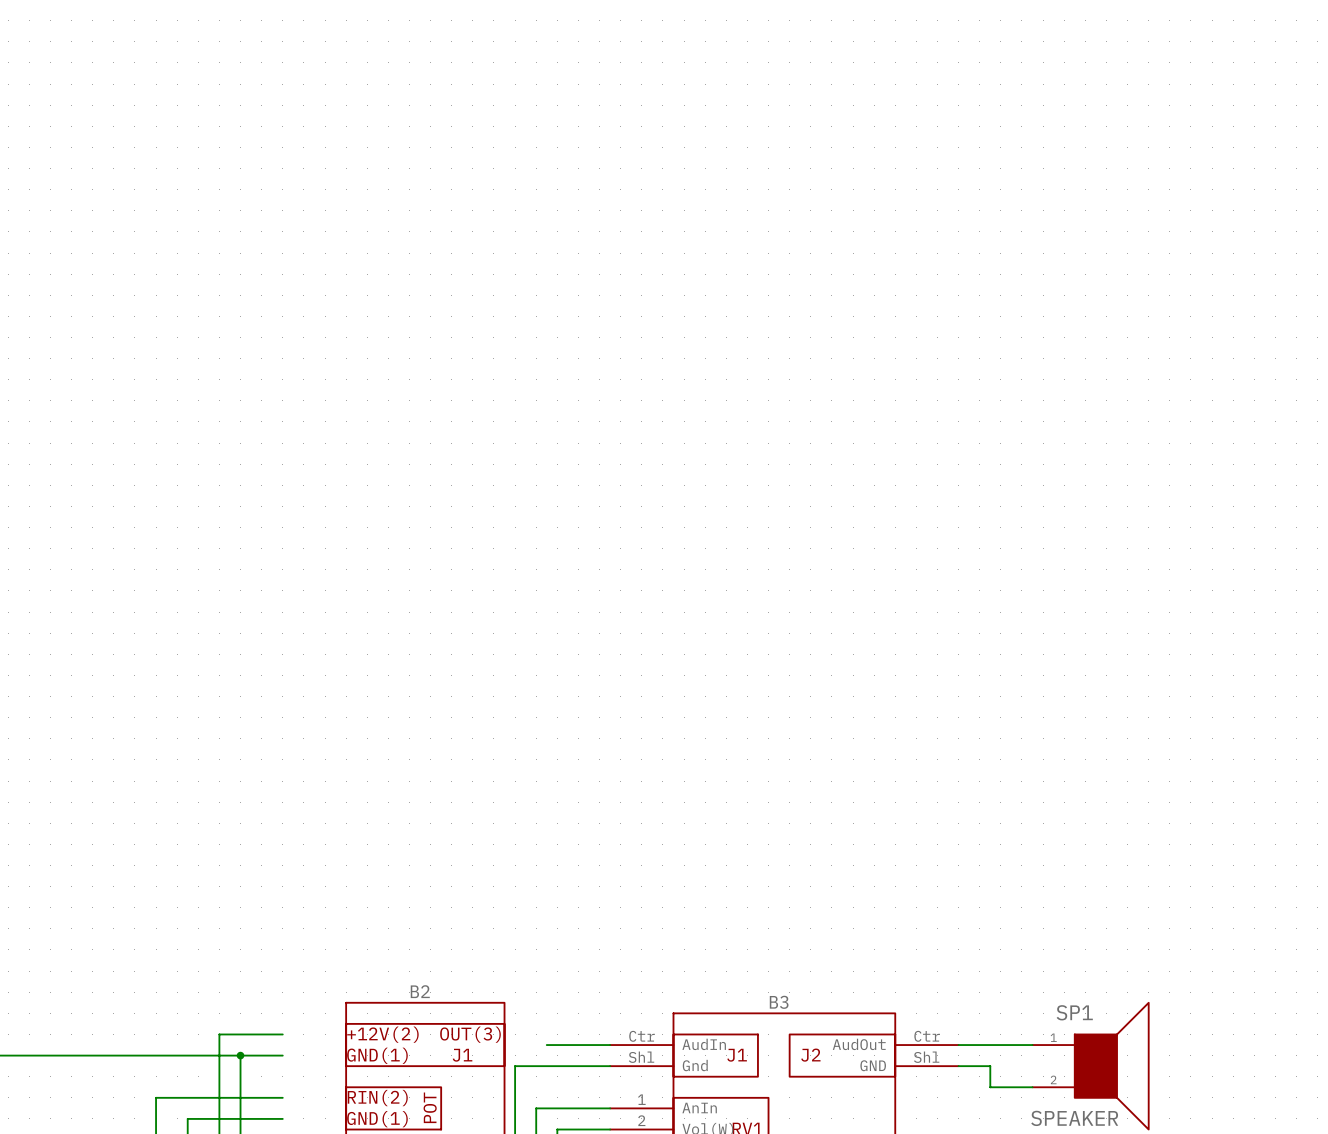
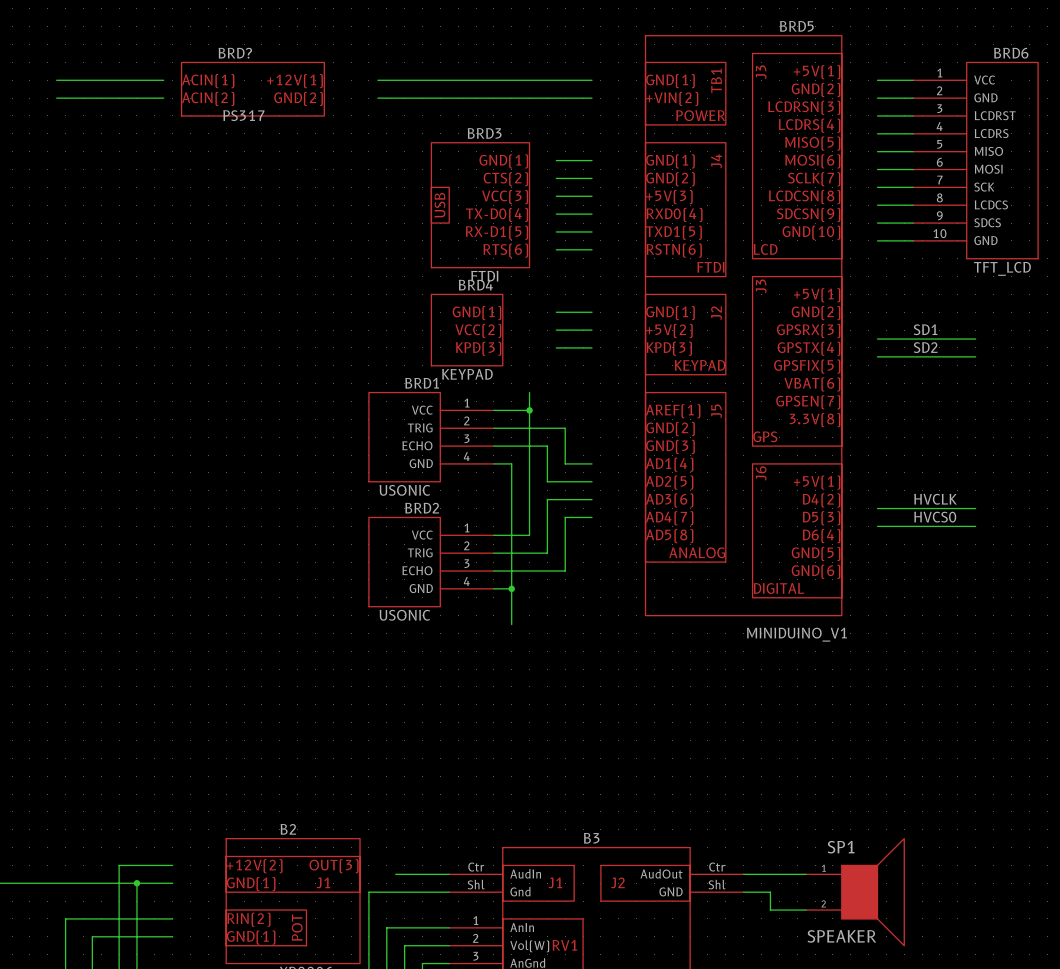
wire: none -> (56, 80) (163, 80)
wire: none -> (377, 80) (591, 80)
wire: none -> (877, 80) (913, 80)
BRD?: none -> PS317 (252, 89)
wire: none -> (56, 98) (163, 98)
wire: none -> (377, 98) (591, 98)
wire: none -> (877, 98) (913, 98)
wire: none -> (877, 115) (913, 115)
wire: none -> (877, 133) (913, 133)
wire: none -> (877, 151) (913, 151)
wire: none -> (556, 160) (591, 160)
BRD6: none -> TFT_LCD (975, 160)
wire: none -> (877, 169) (913, 169)
wire: none -> (556, 178) (591, 178)
wire: none -> (877, 187) (913, 187)
wire: none -> (556, 196) (591, 196)
BRD3: none -> FTDI (480, 205)
wire: none -> (877, 205) (913, 205)
wire: none -> (556, 214) (591, 214)
wire: none -> (877, 223) (913, 223)
wire: none -> (556, 231) (591, 231)
wire: none -> (877, 240) (913, 240)
wire: none -> (556, 249) (591, 249)
wire: none -> (556, 312) (591, 312)
BRD5: none -> MINIDUINO_V1 (743, 325)
BRD4: none -> KEYPAD (467, 330)
wire: none -> (556, 330) (591, 330)
label: none -> SD1 (925, 329)
wire: none -> (877, 339) (975, 339)
wire: none -> (556, 347) (591, 347)
label: none -> SD2 (925, 347)
wire: none -> (877, 356) (975, 356)
wire: none -> (529, 392) (529, 535) (493, 535)
wire: none -> (493, 410) (529, 410)
junction: none -> (529, 410)
wire: none -> (493, 428) (565, 428) (565, 463) (591, 463)
BRD1: none -> USONIC (431, 437)
wire: none -> (493, 446) (547, 446) (547, 481) (591, 481)
wire: none -> (493, 463) (511, 463) (511, 624)
wire: none -> (591, 499) (547, 499) (547, 553) (493, 553)
label: none -> HVCLK (935, 499)
wire: none -> (877, 508) (975, 508)
wire: none -> (591, 517) (565, 517) (565, 571) (493, 571)
label: none -> HVCS0 (935, 517)
wire: none -> (877, 526) (975, 526)
BRD2: none -> USONIC (431, 562)
wire: none -> (493, 588) (511, 588)
junction: none -> (511, 588)

